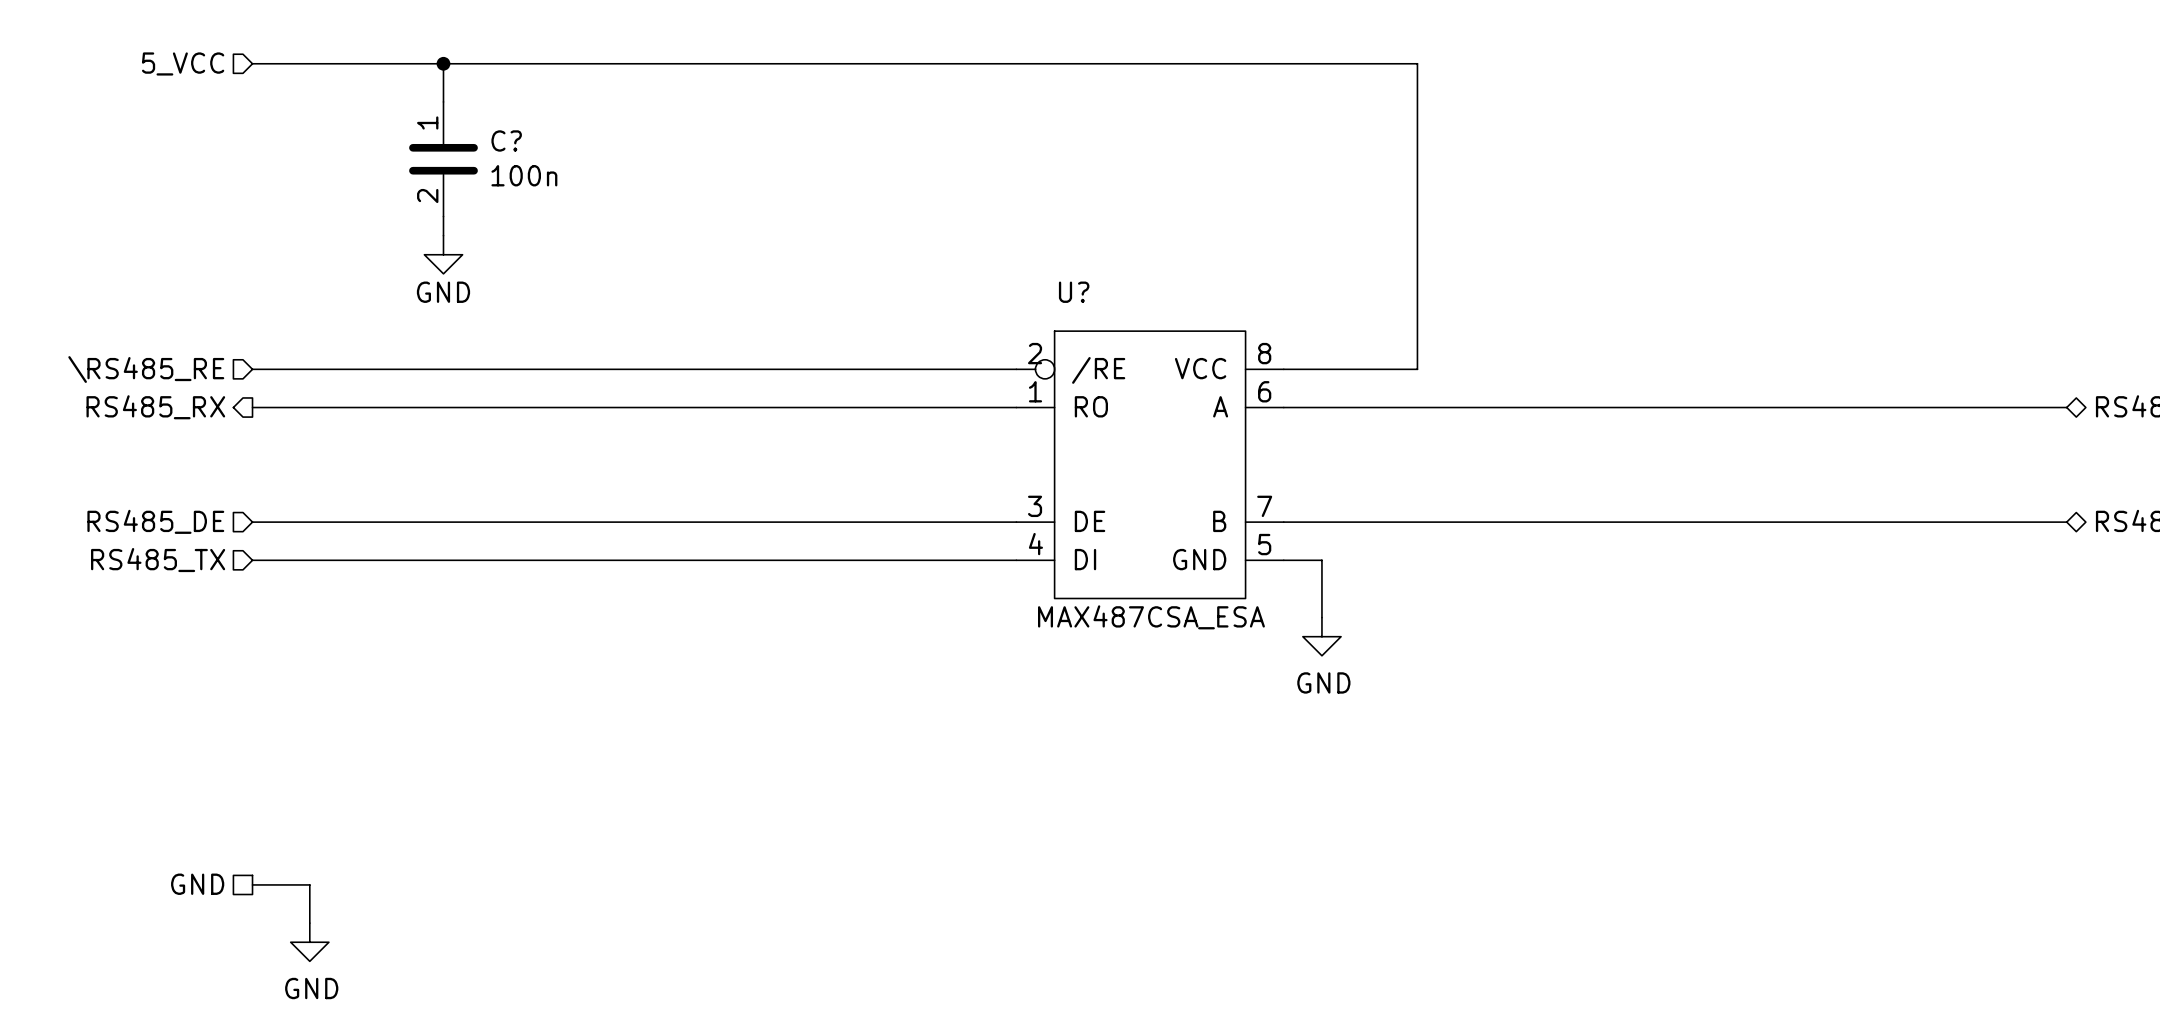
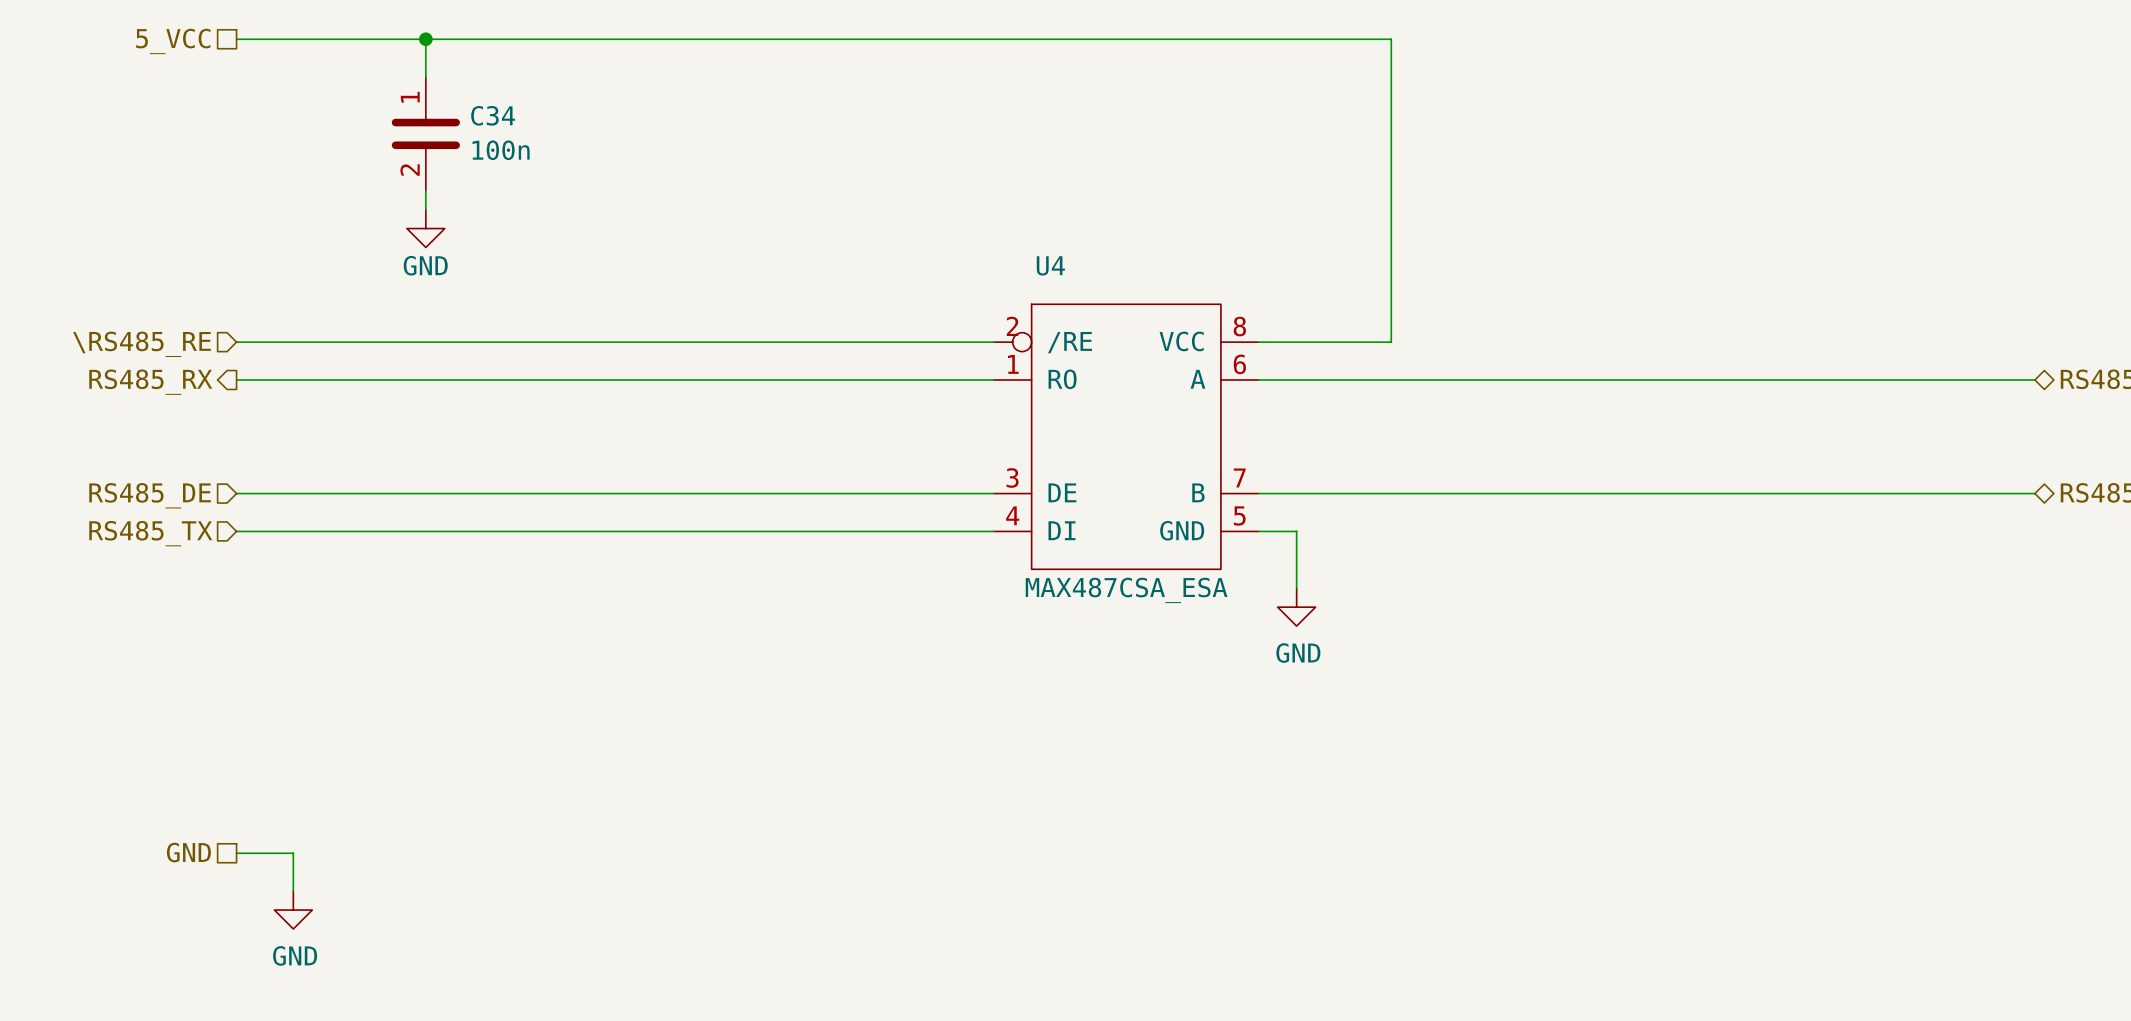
hierarchical label shape: input (183, 63) -> passive (173, 41)
C? name: C? (506, 140) -> C34 (493, 115)
U? name: U? (1074, 292) -> U4 (1050, 265)

